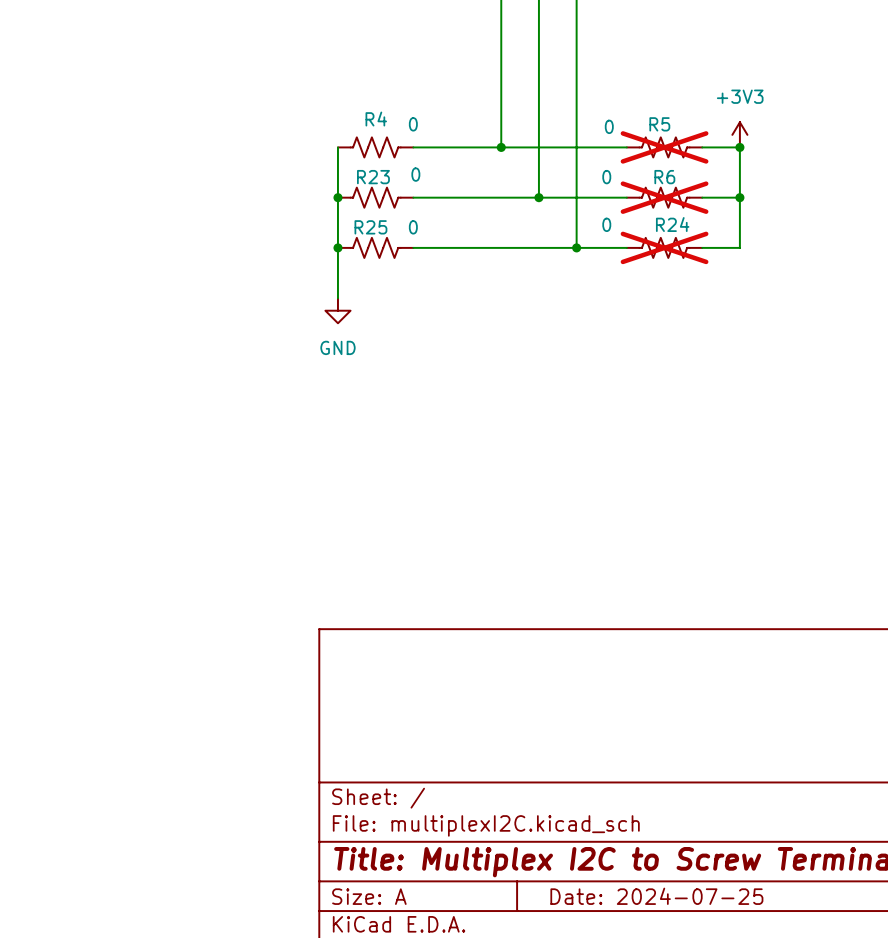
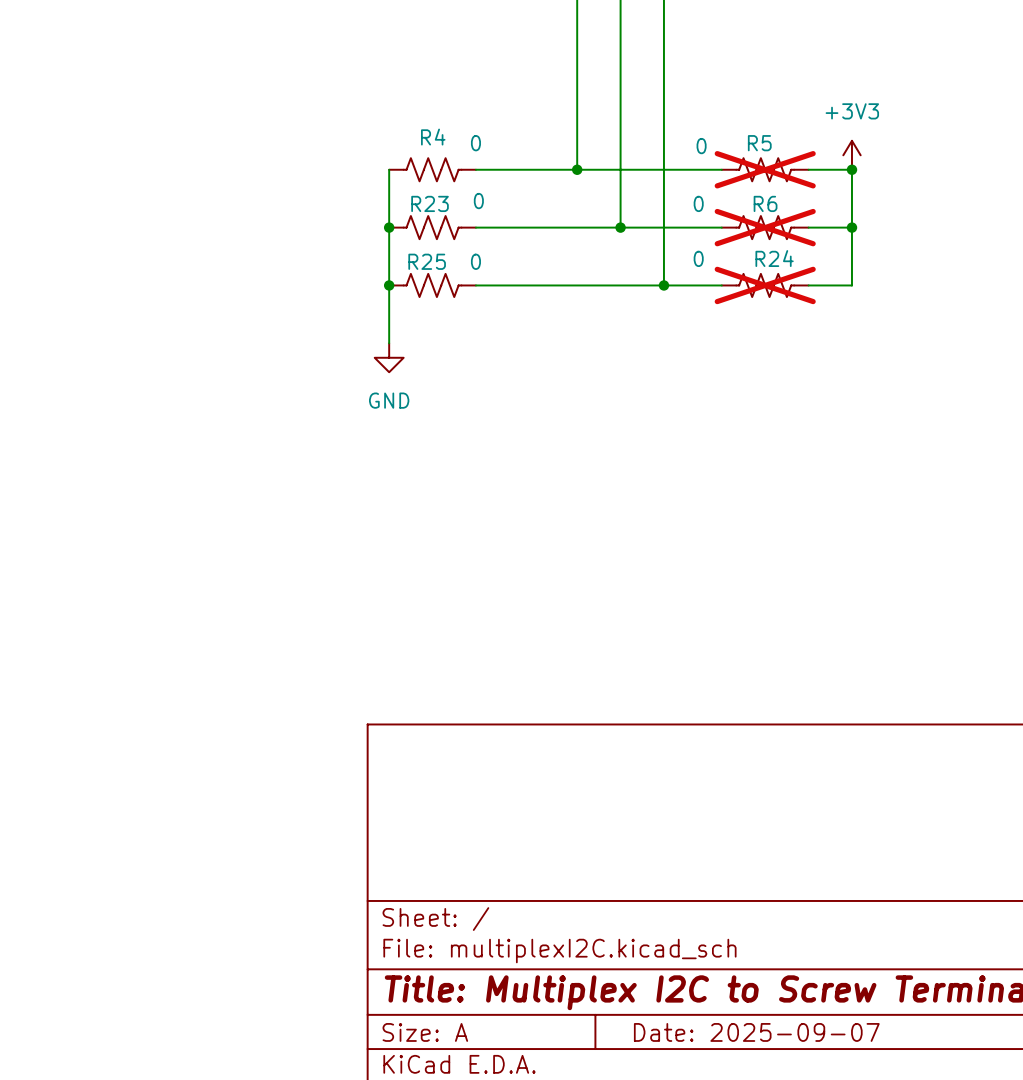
title block: Date: 2024-07-25 (656, 896) -> Date: 2025-09-07 (756, 1032)

